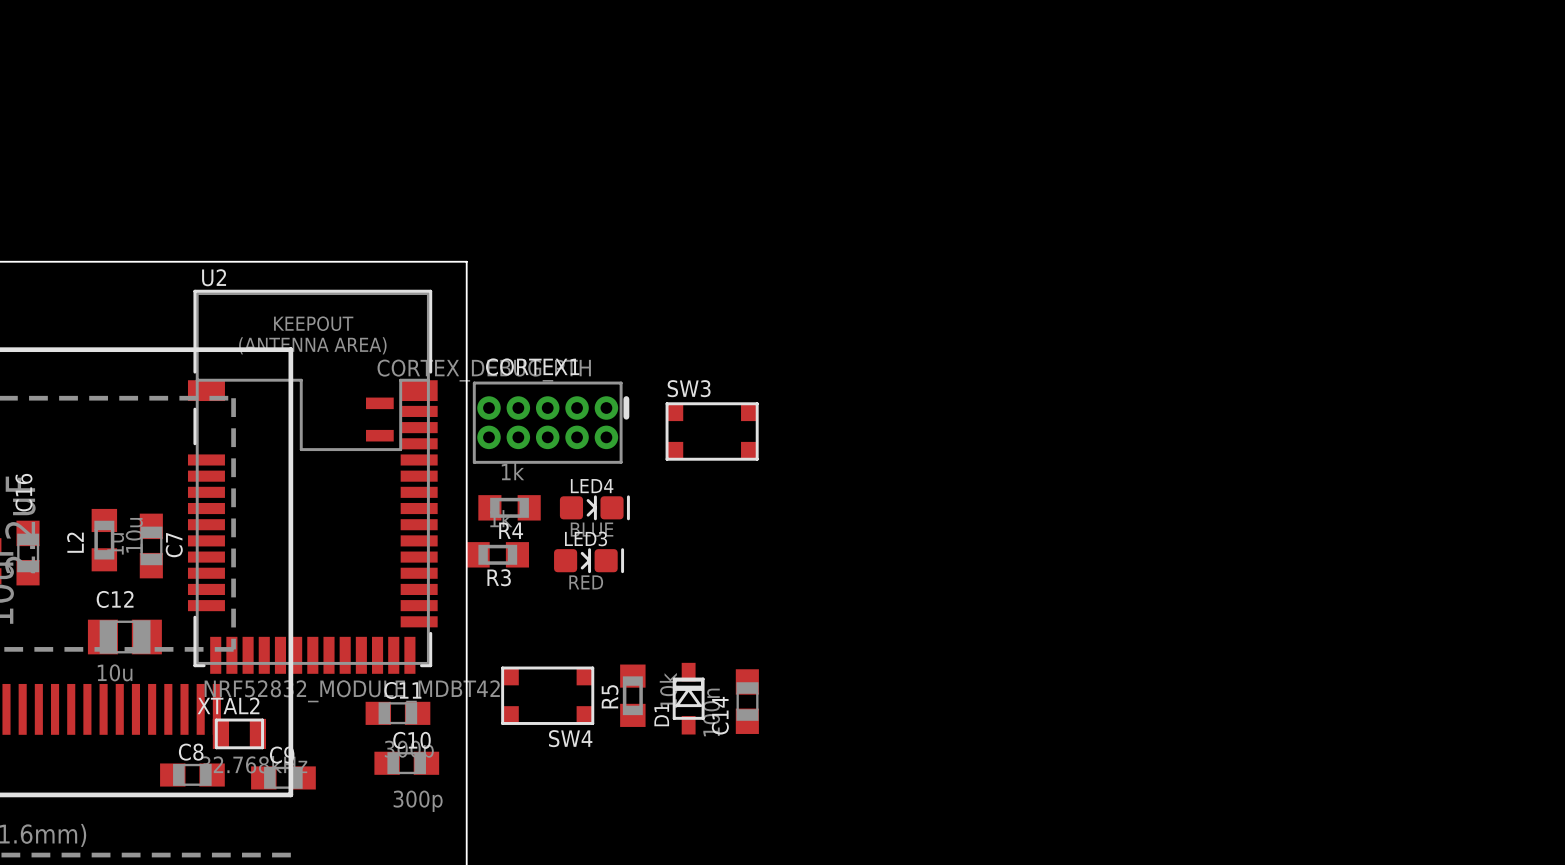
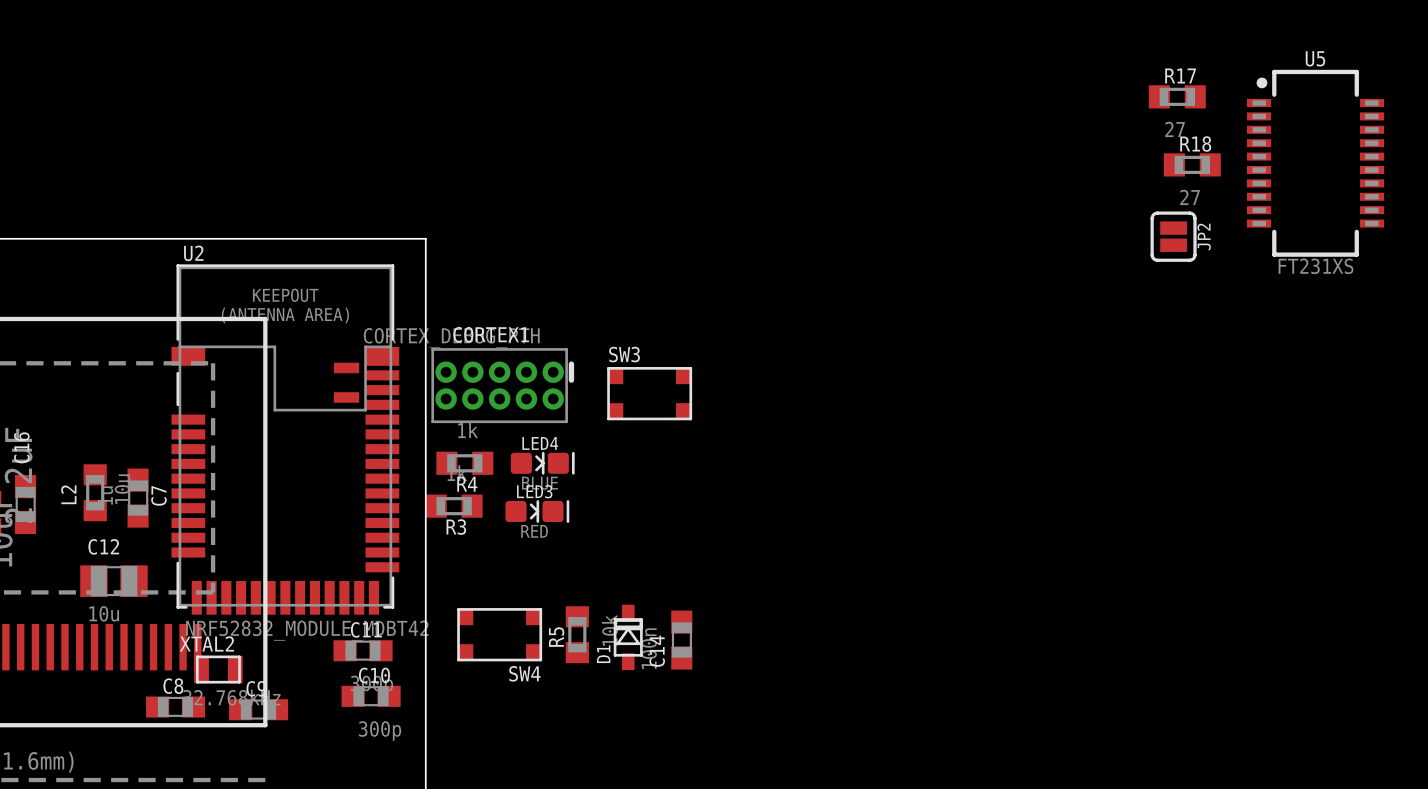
R17: none -> 27 (1177, 96)
U5: none -> FT231XS (1315, 163)
R18: none -> 27 (1192, 164)
JP2: none -> (1173, 236)

